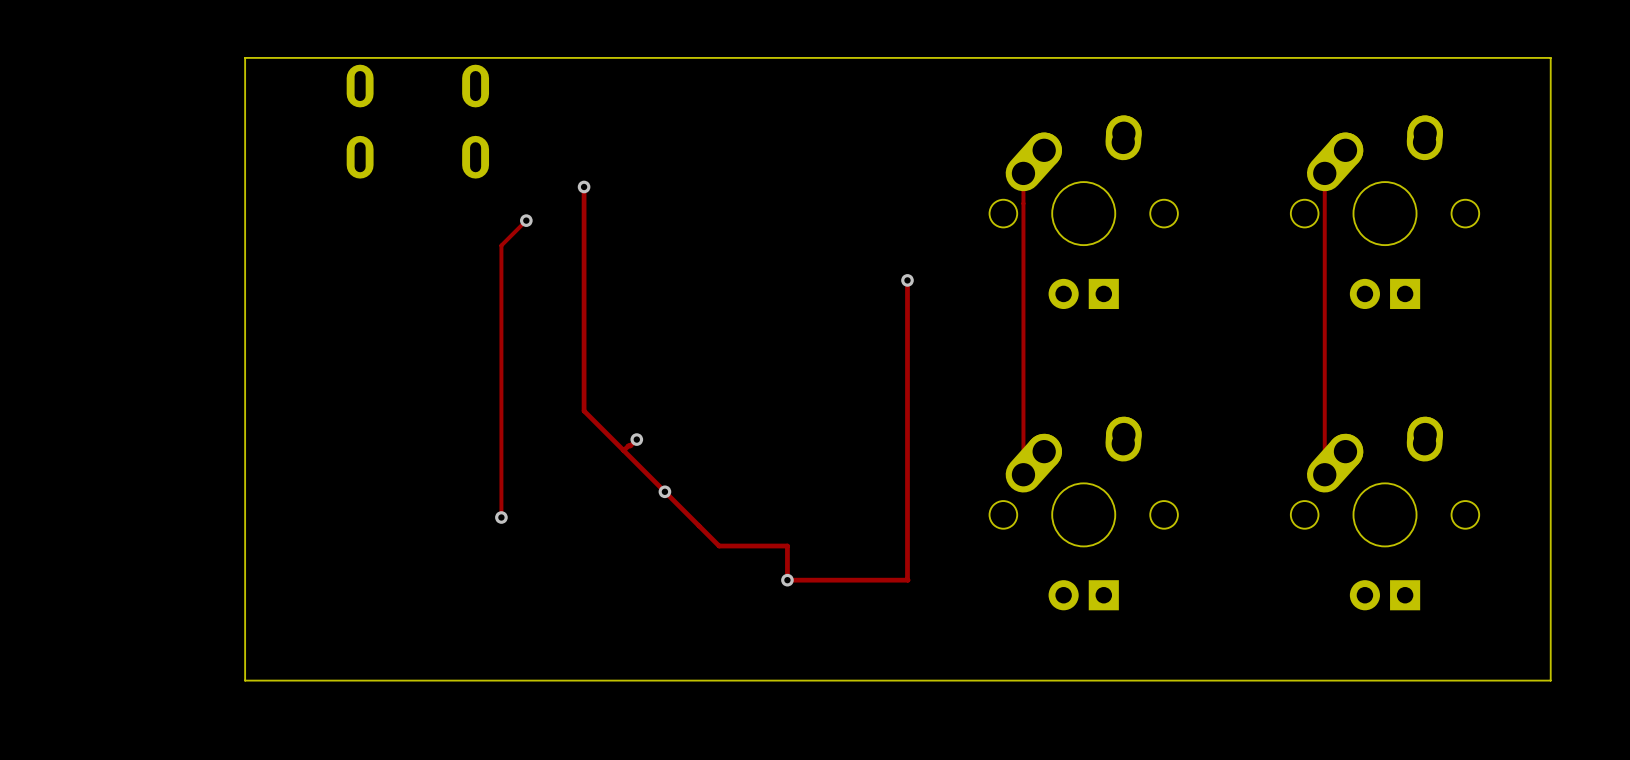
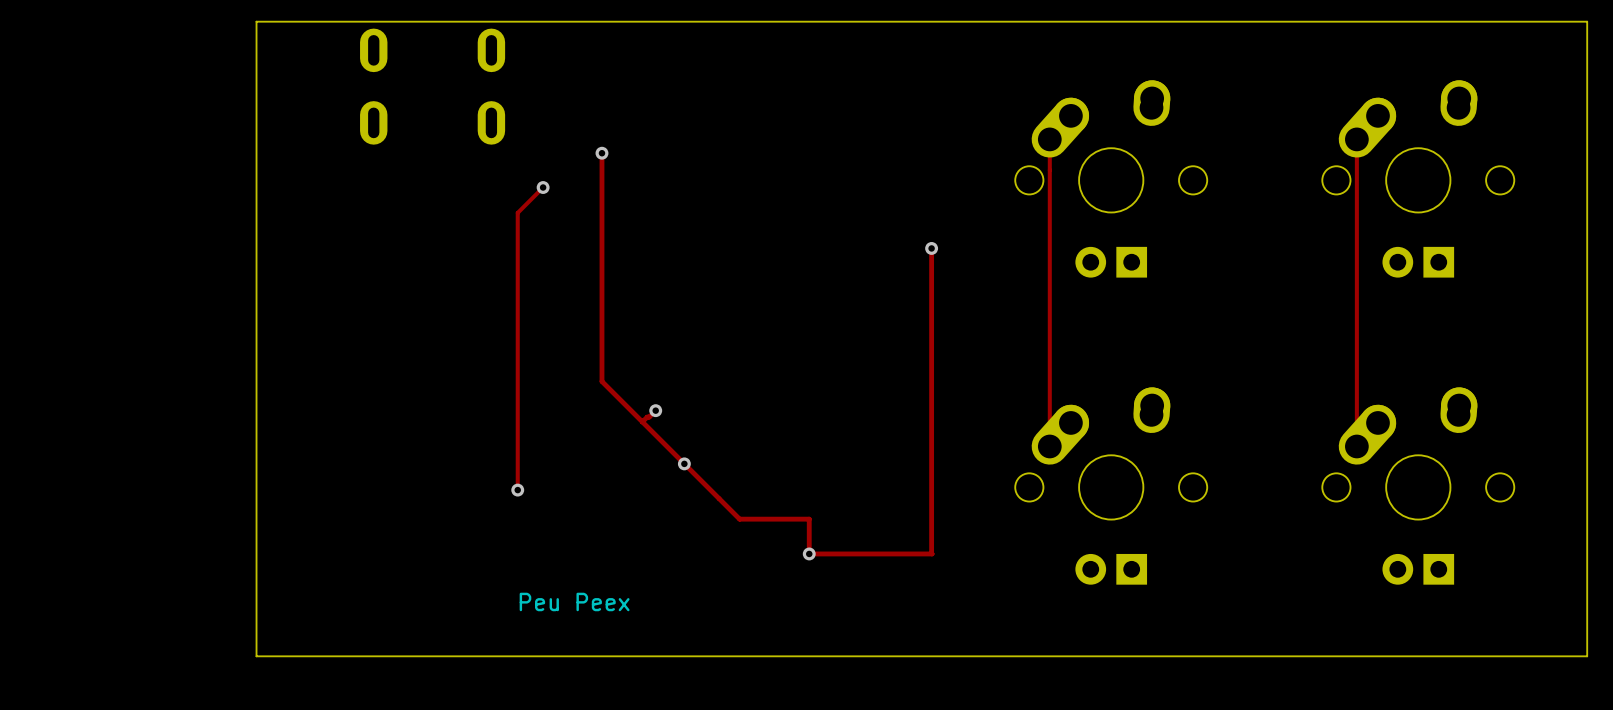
text: none -> Peu Peex (574, 601)

